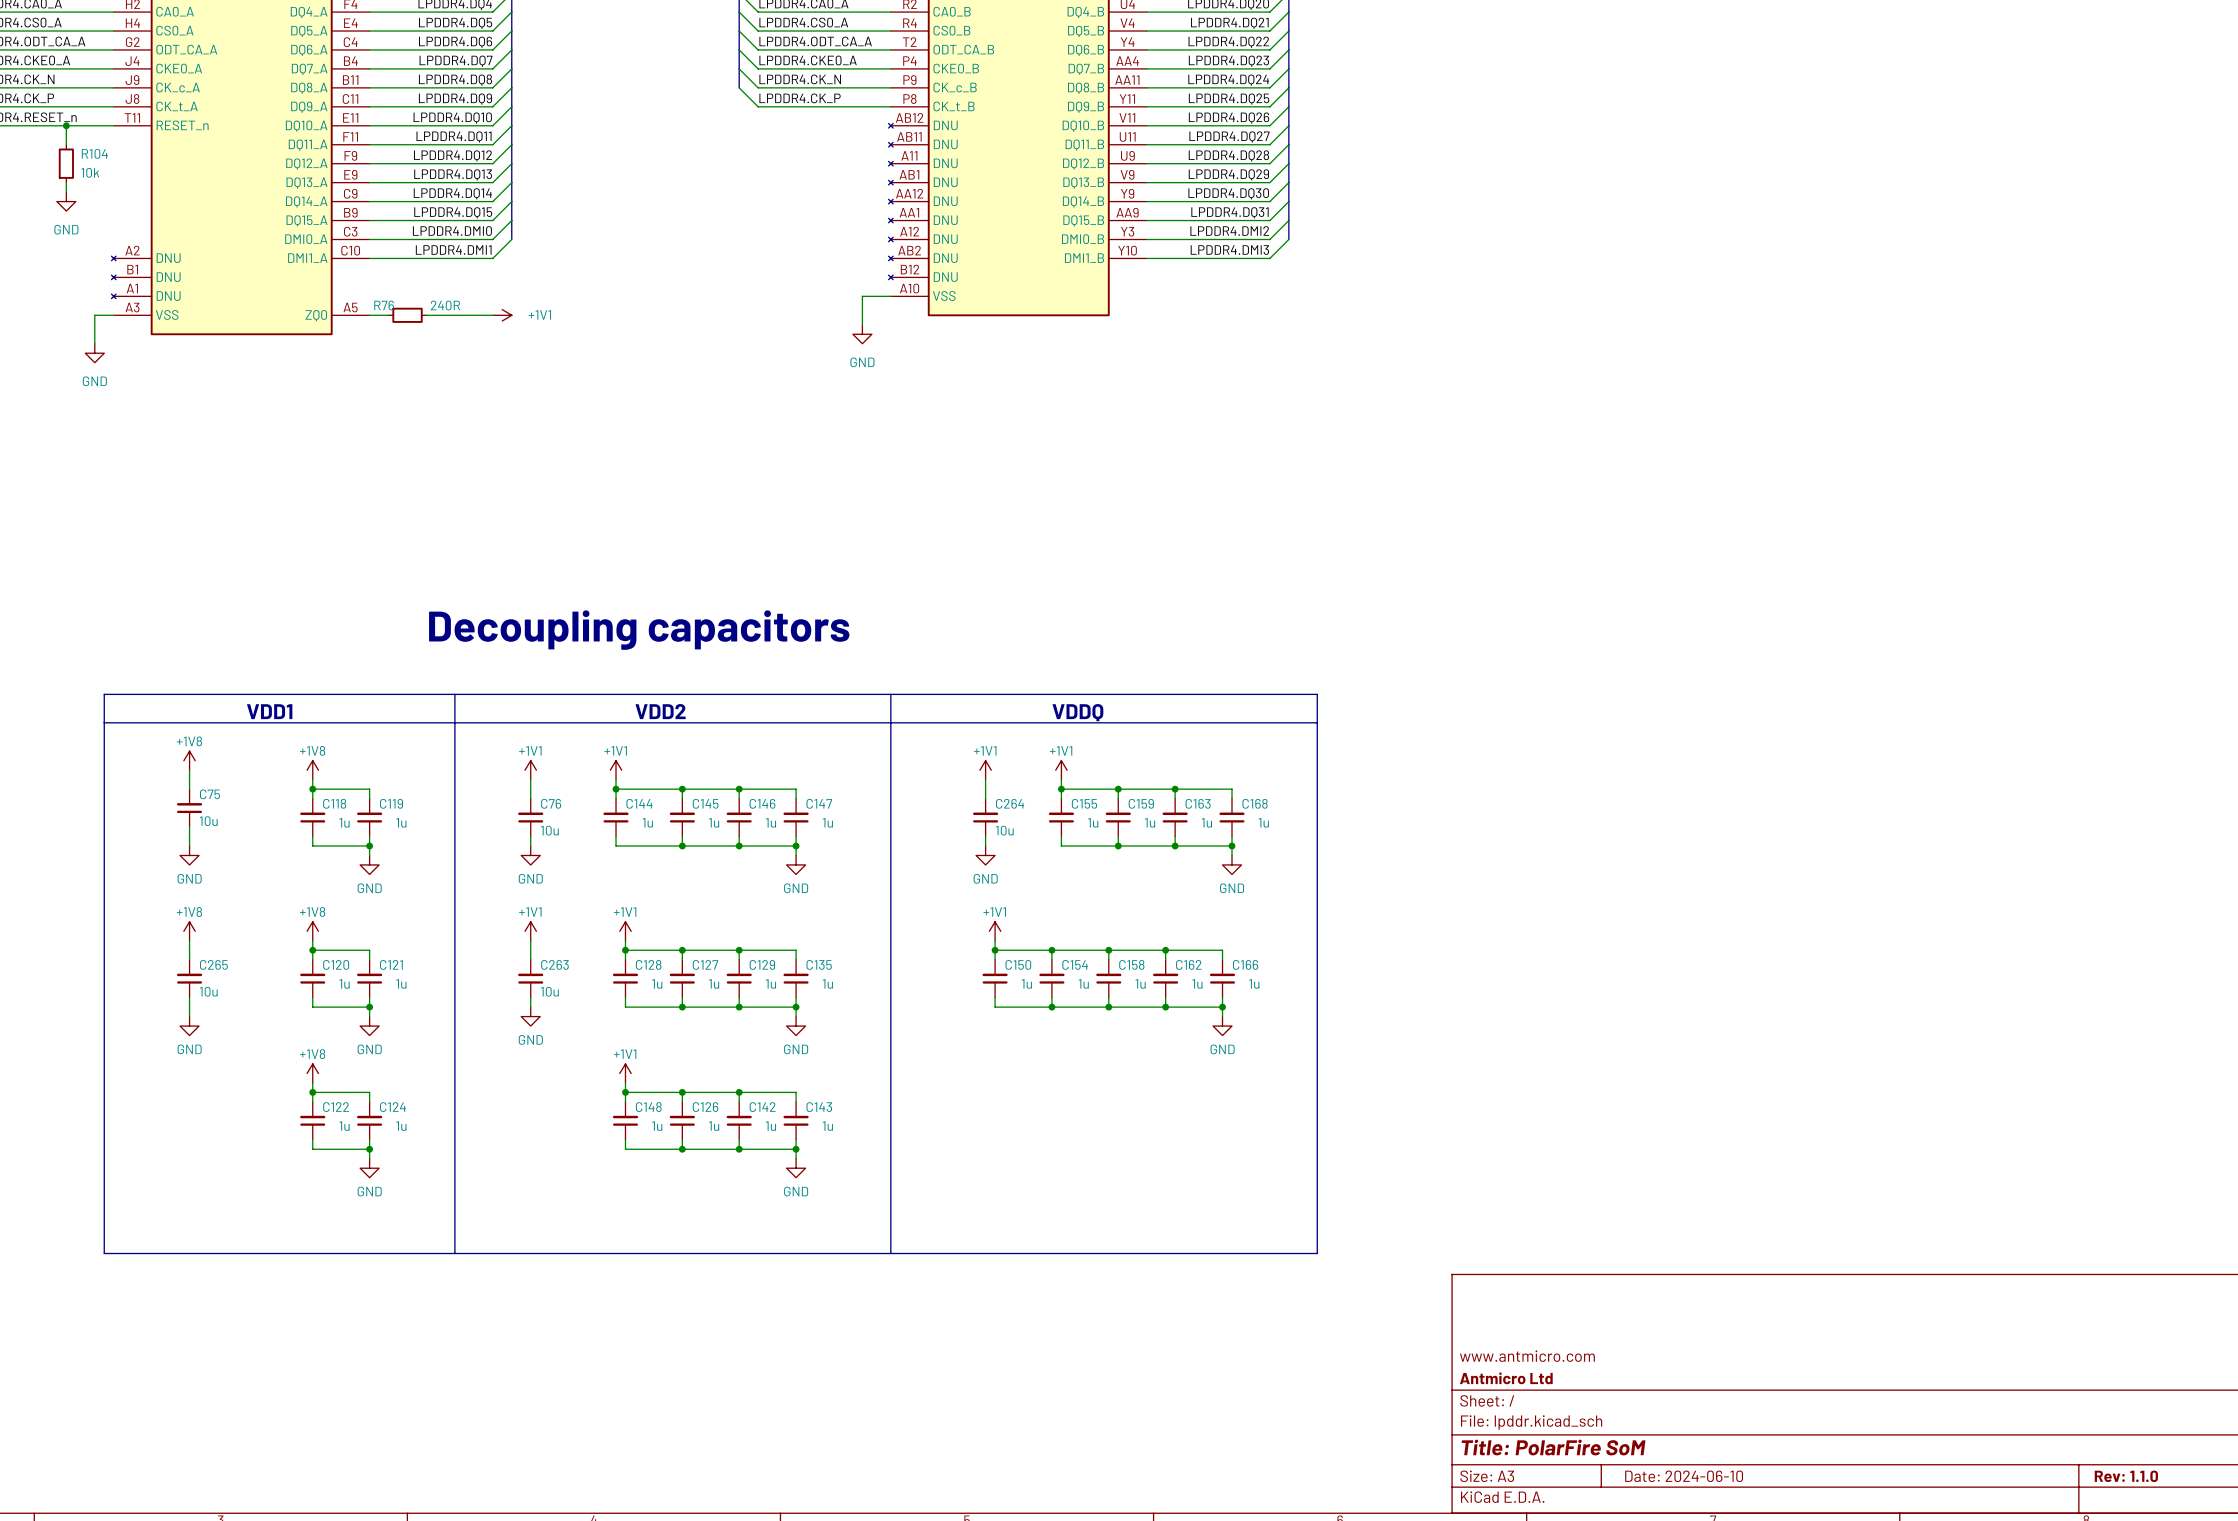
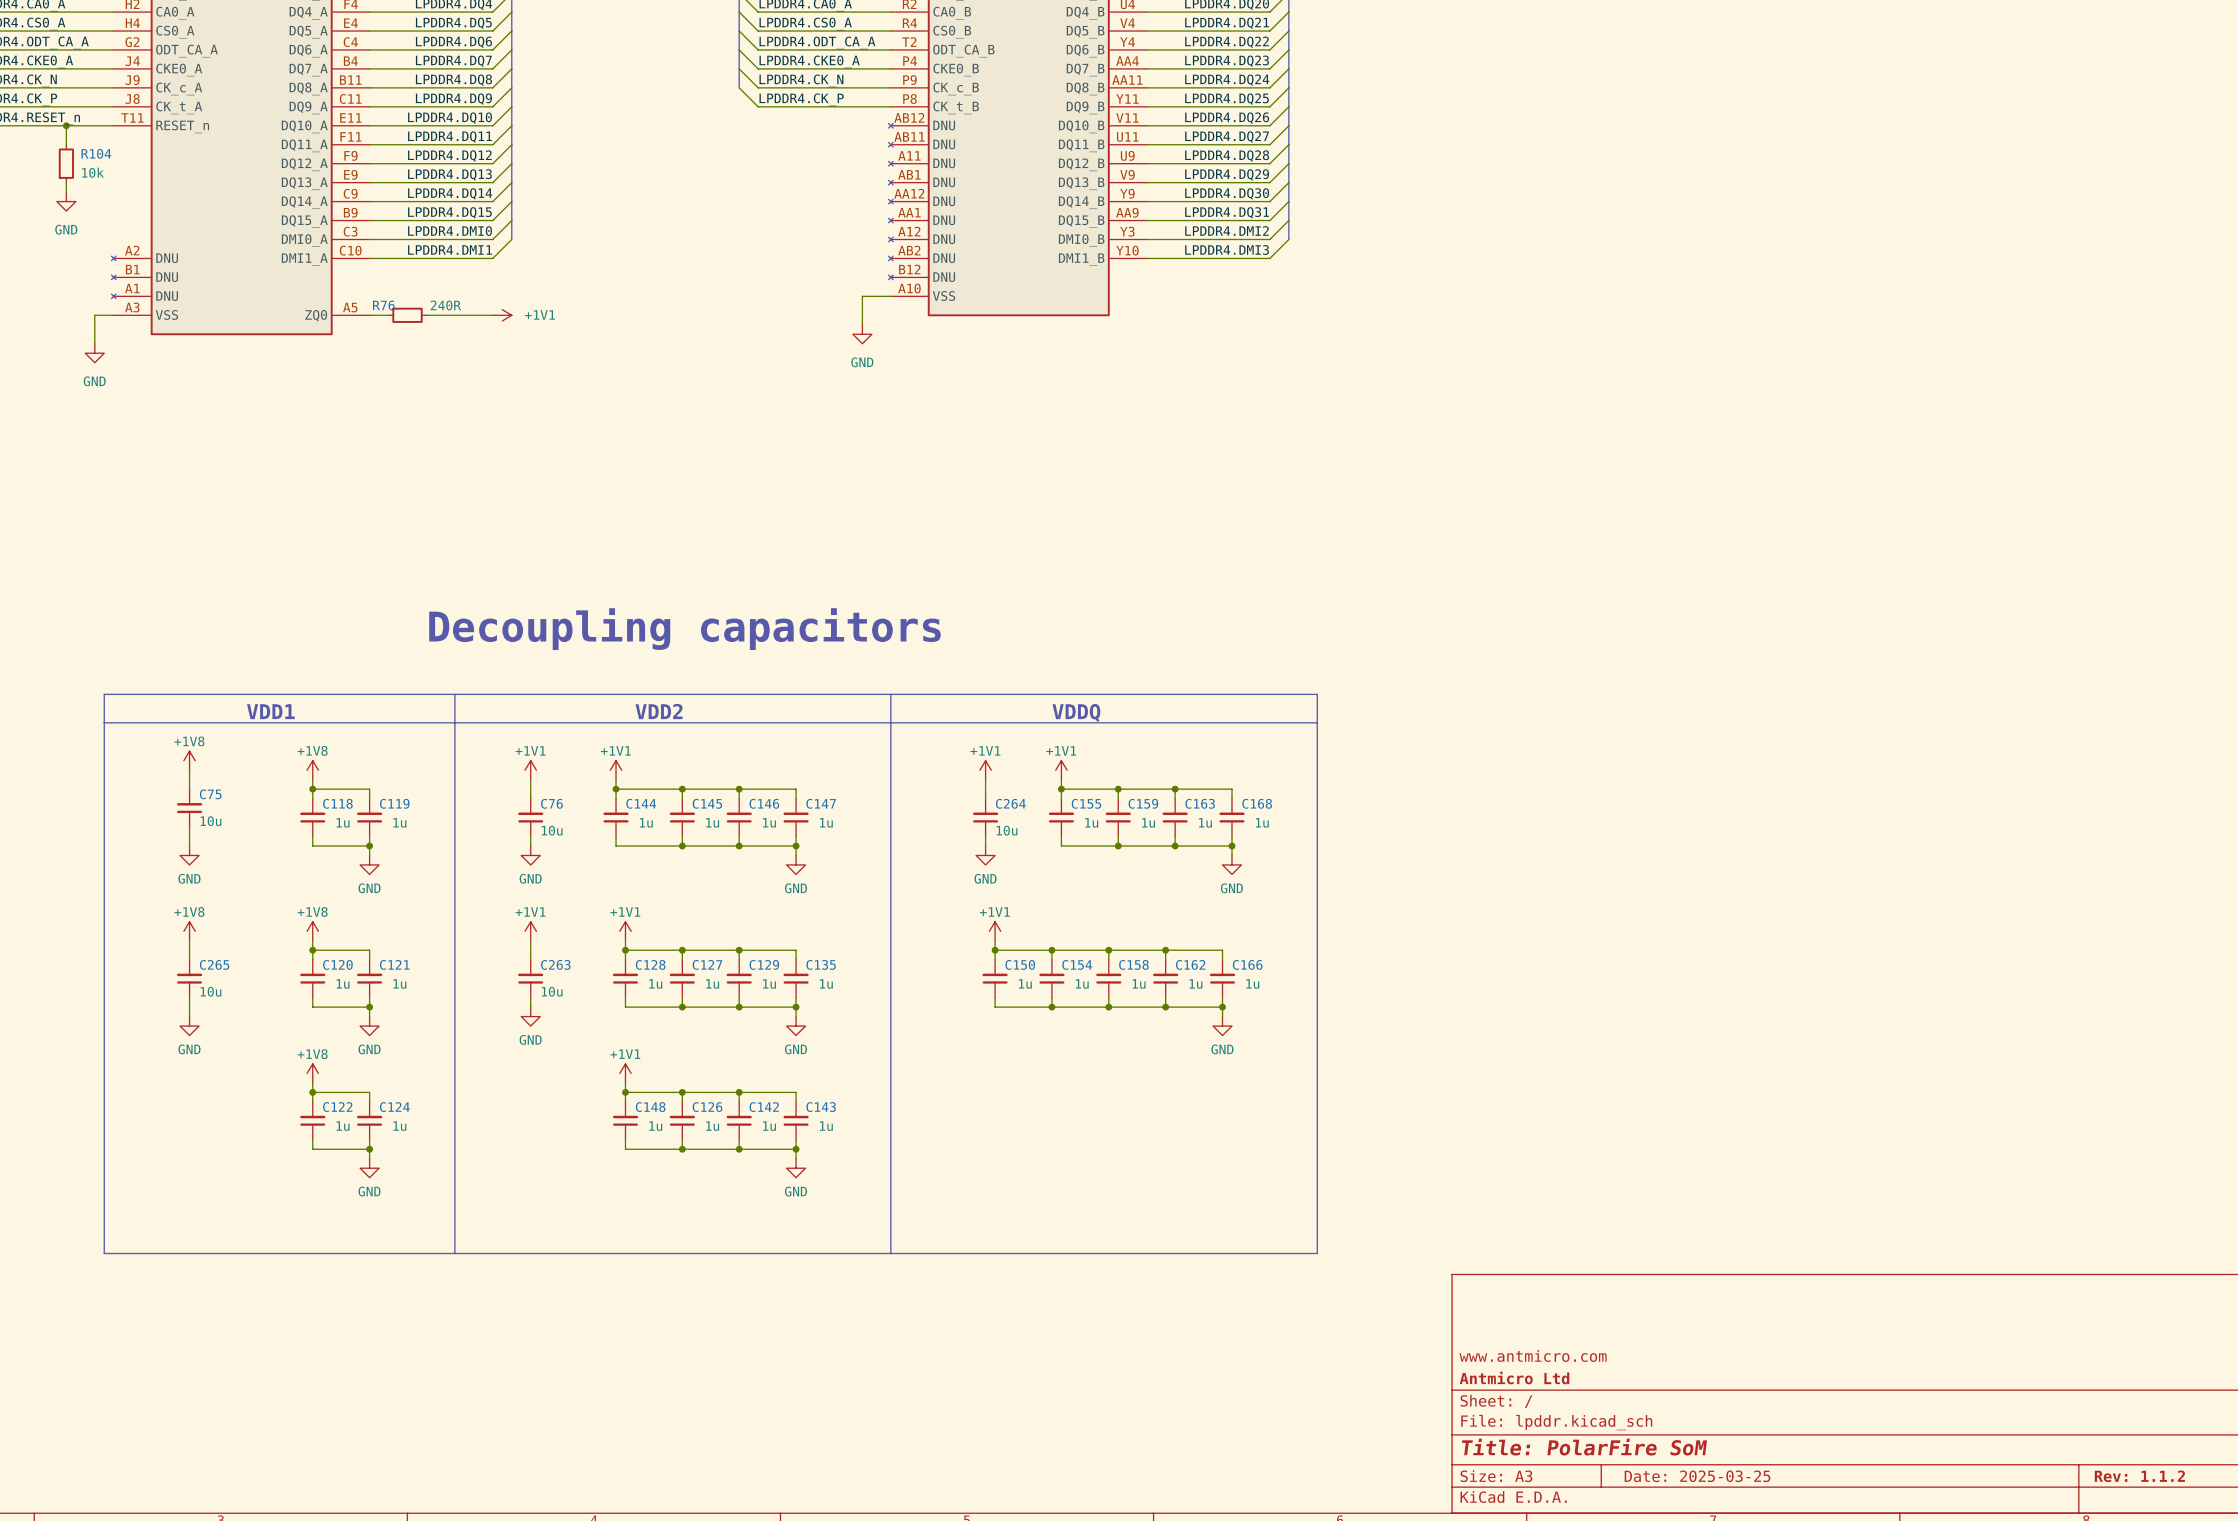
title block: Date: 2024-06-10 (1684, 1476) -> Date: 2025-03-25 (1697, 1476)
title block: Rev: 1.1.0 (2126, 1476) -> Rev: 1.1.2 (2139, 1476)

